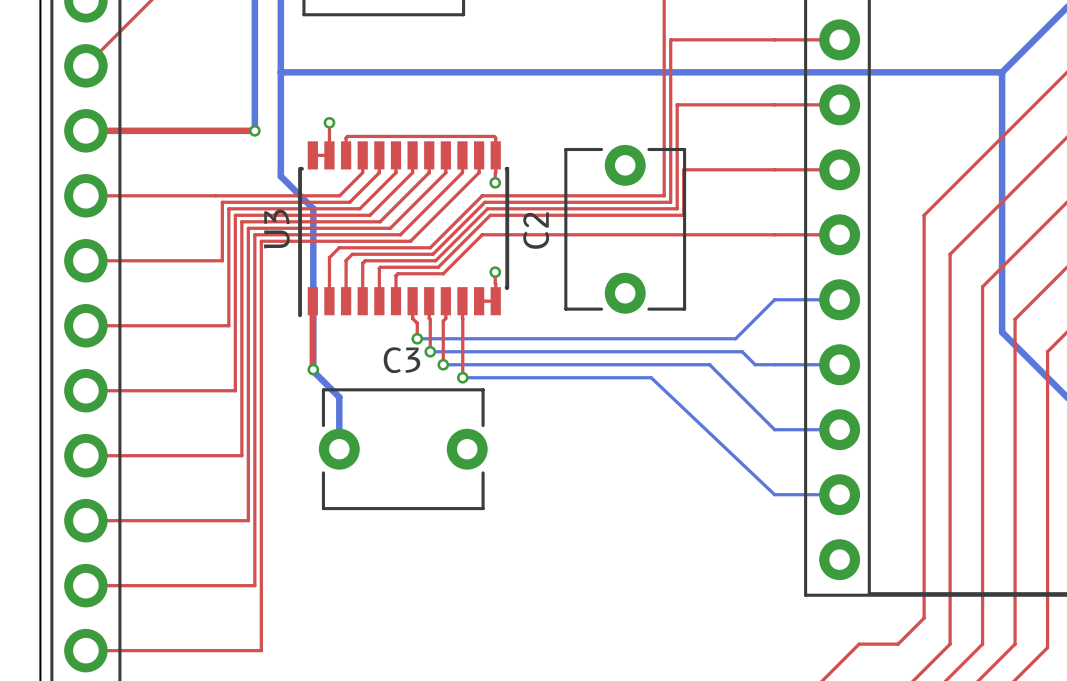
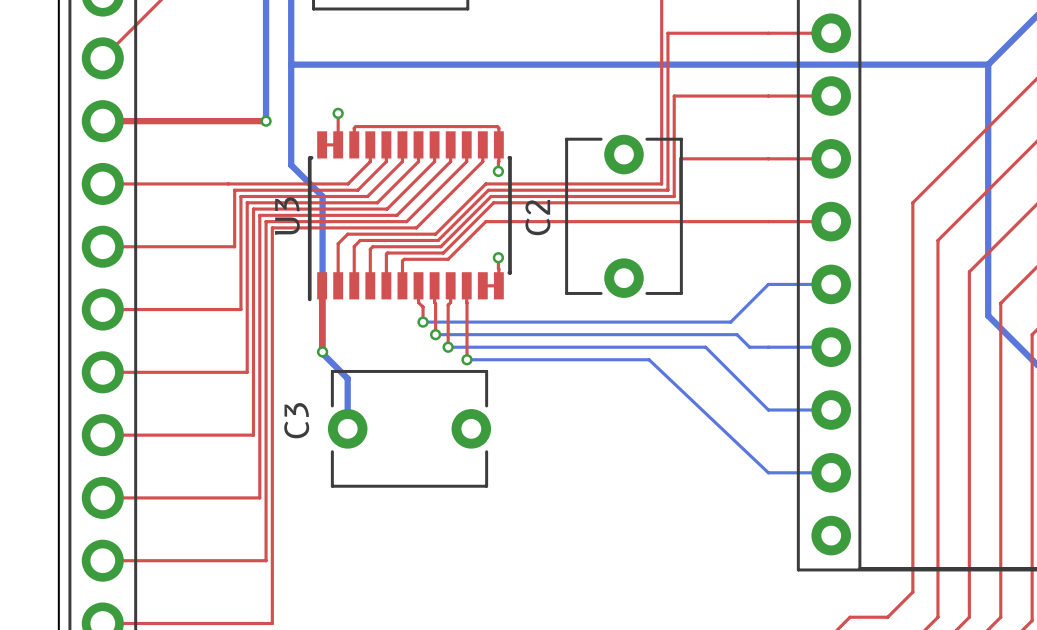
C3 name rotation: 0° (401, 360) -> 90° counterclockwise (296, 420)
C3 name position: C3 (401, 360) -> C3 (296, 420)

